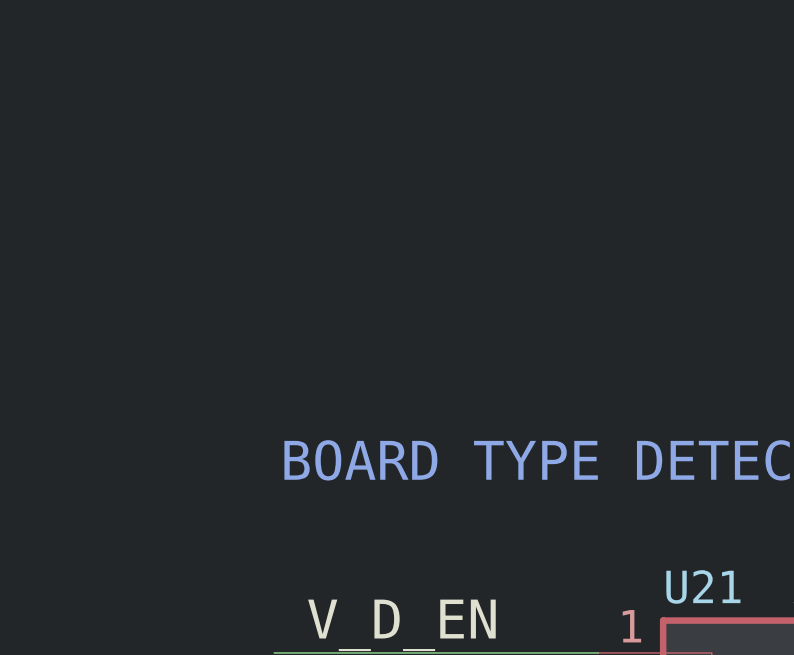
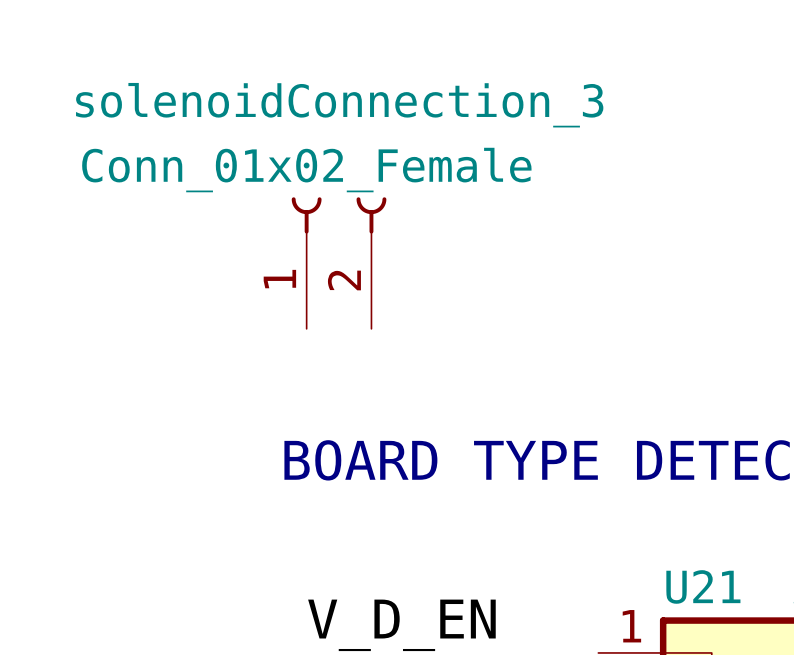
solenoidConnection_3: none -> Conn_01x02_Female (339, 263)
wire: (274, 652) (598, 652) -> none

